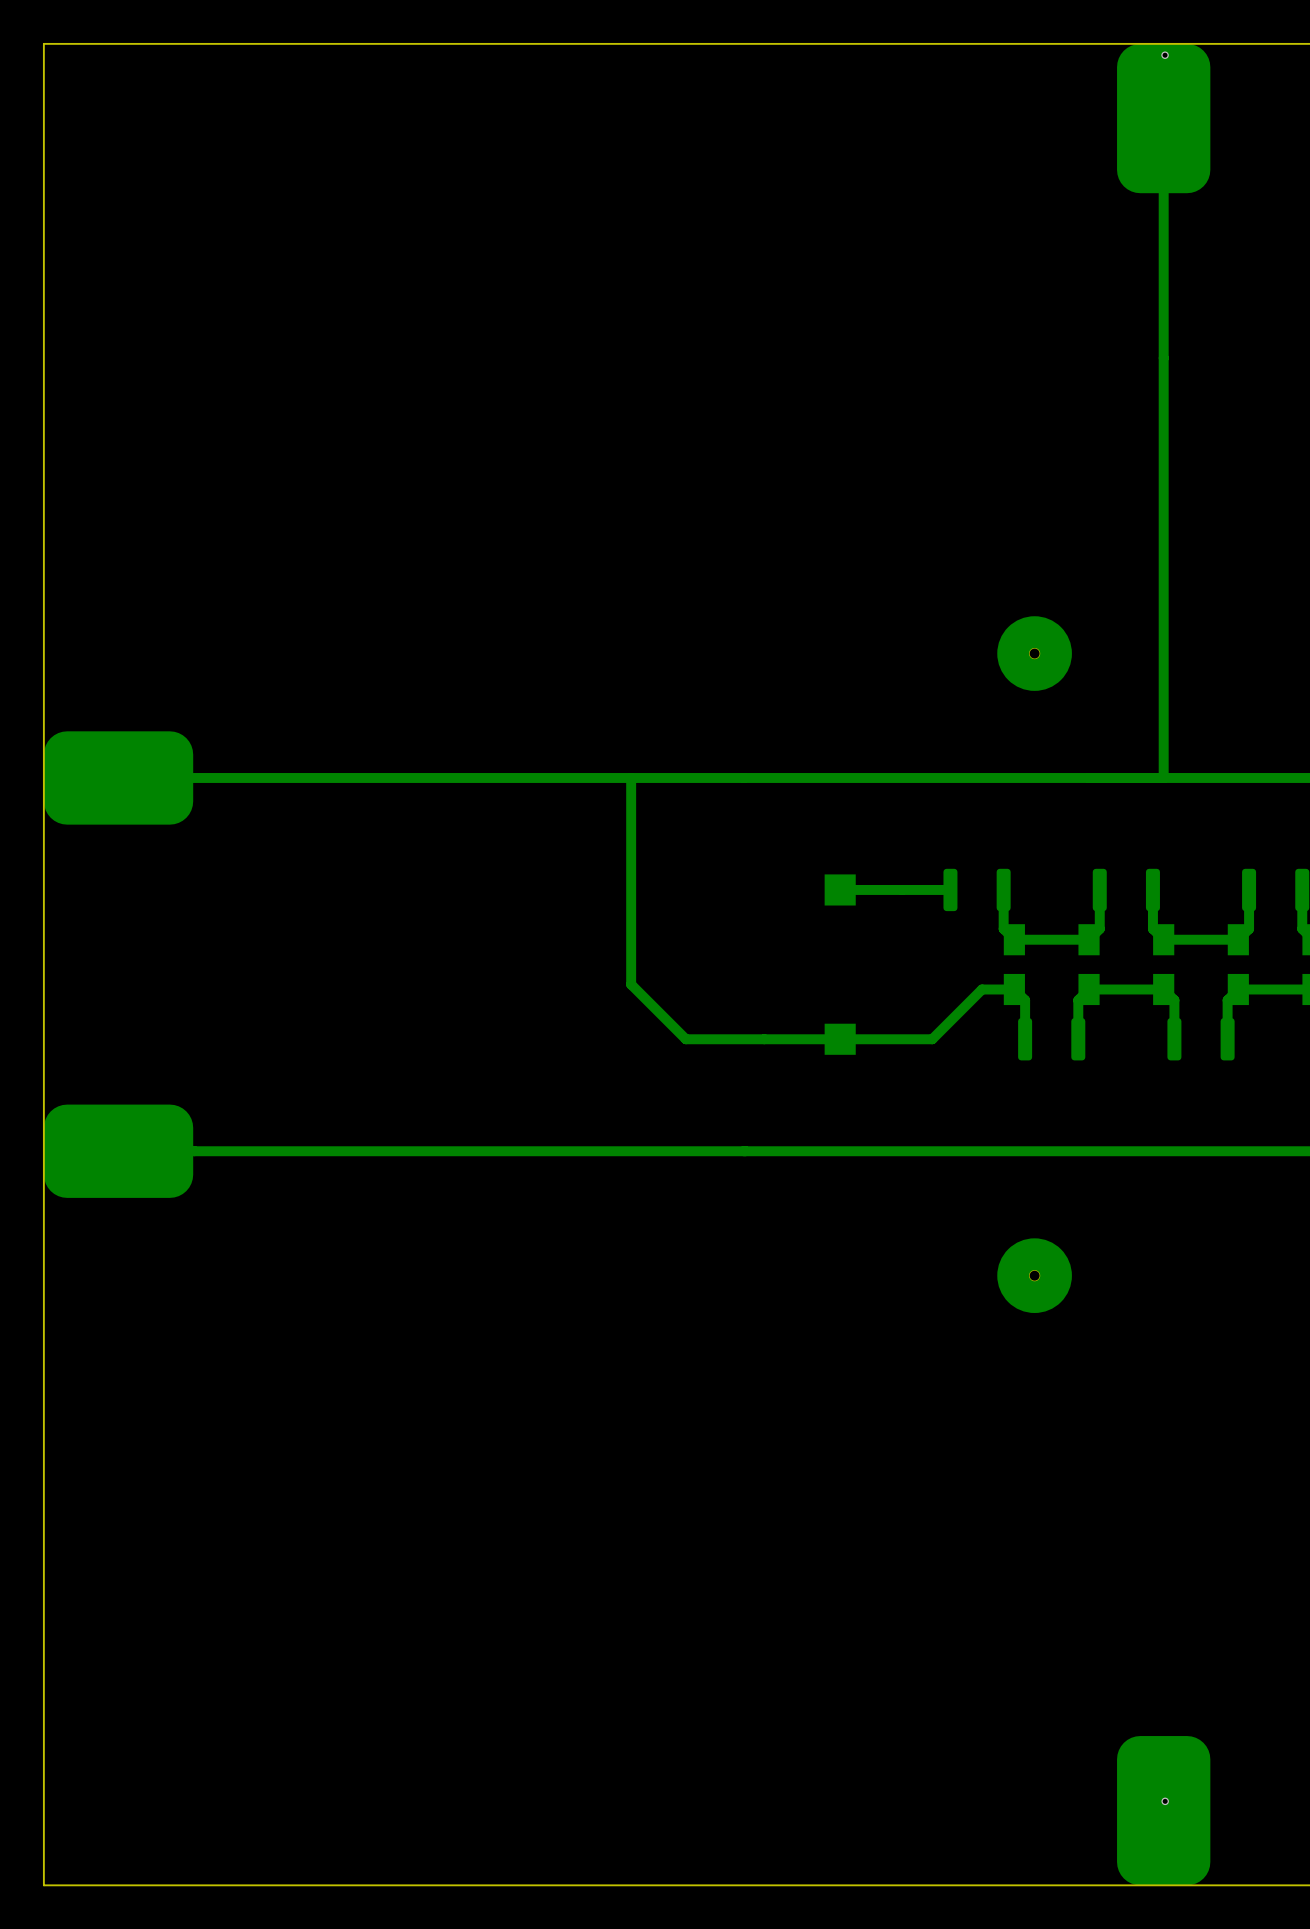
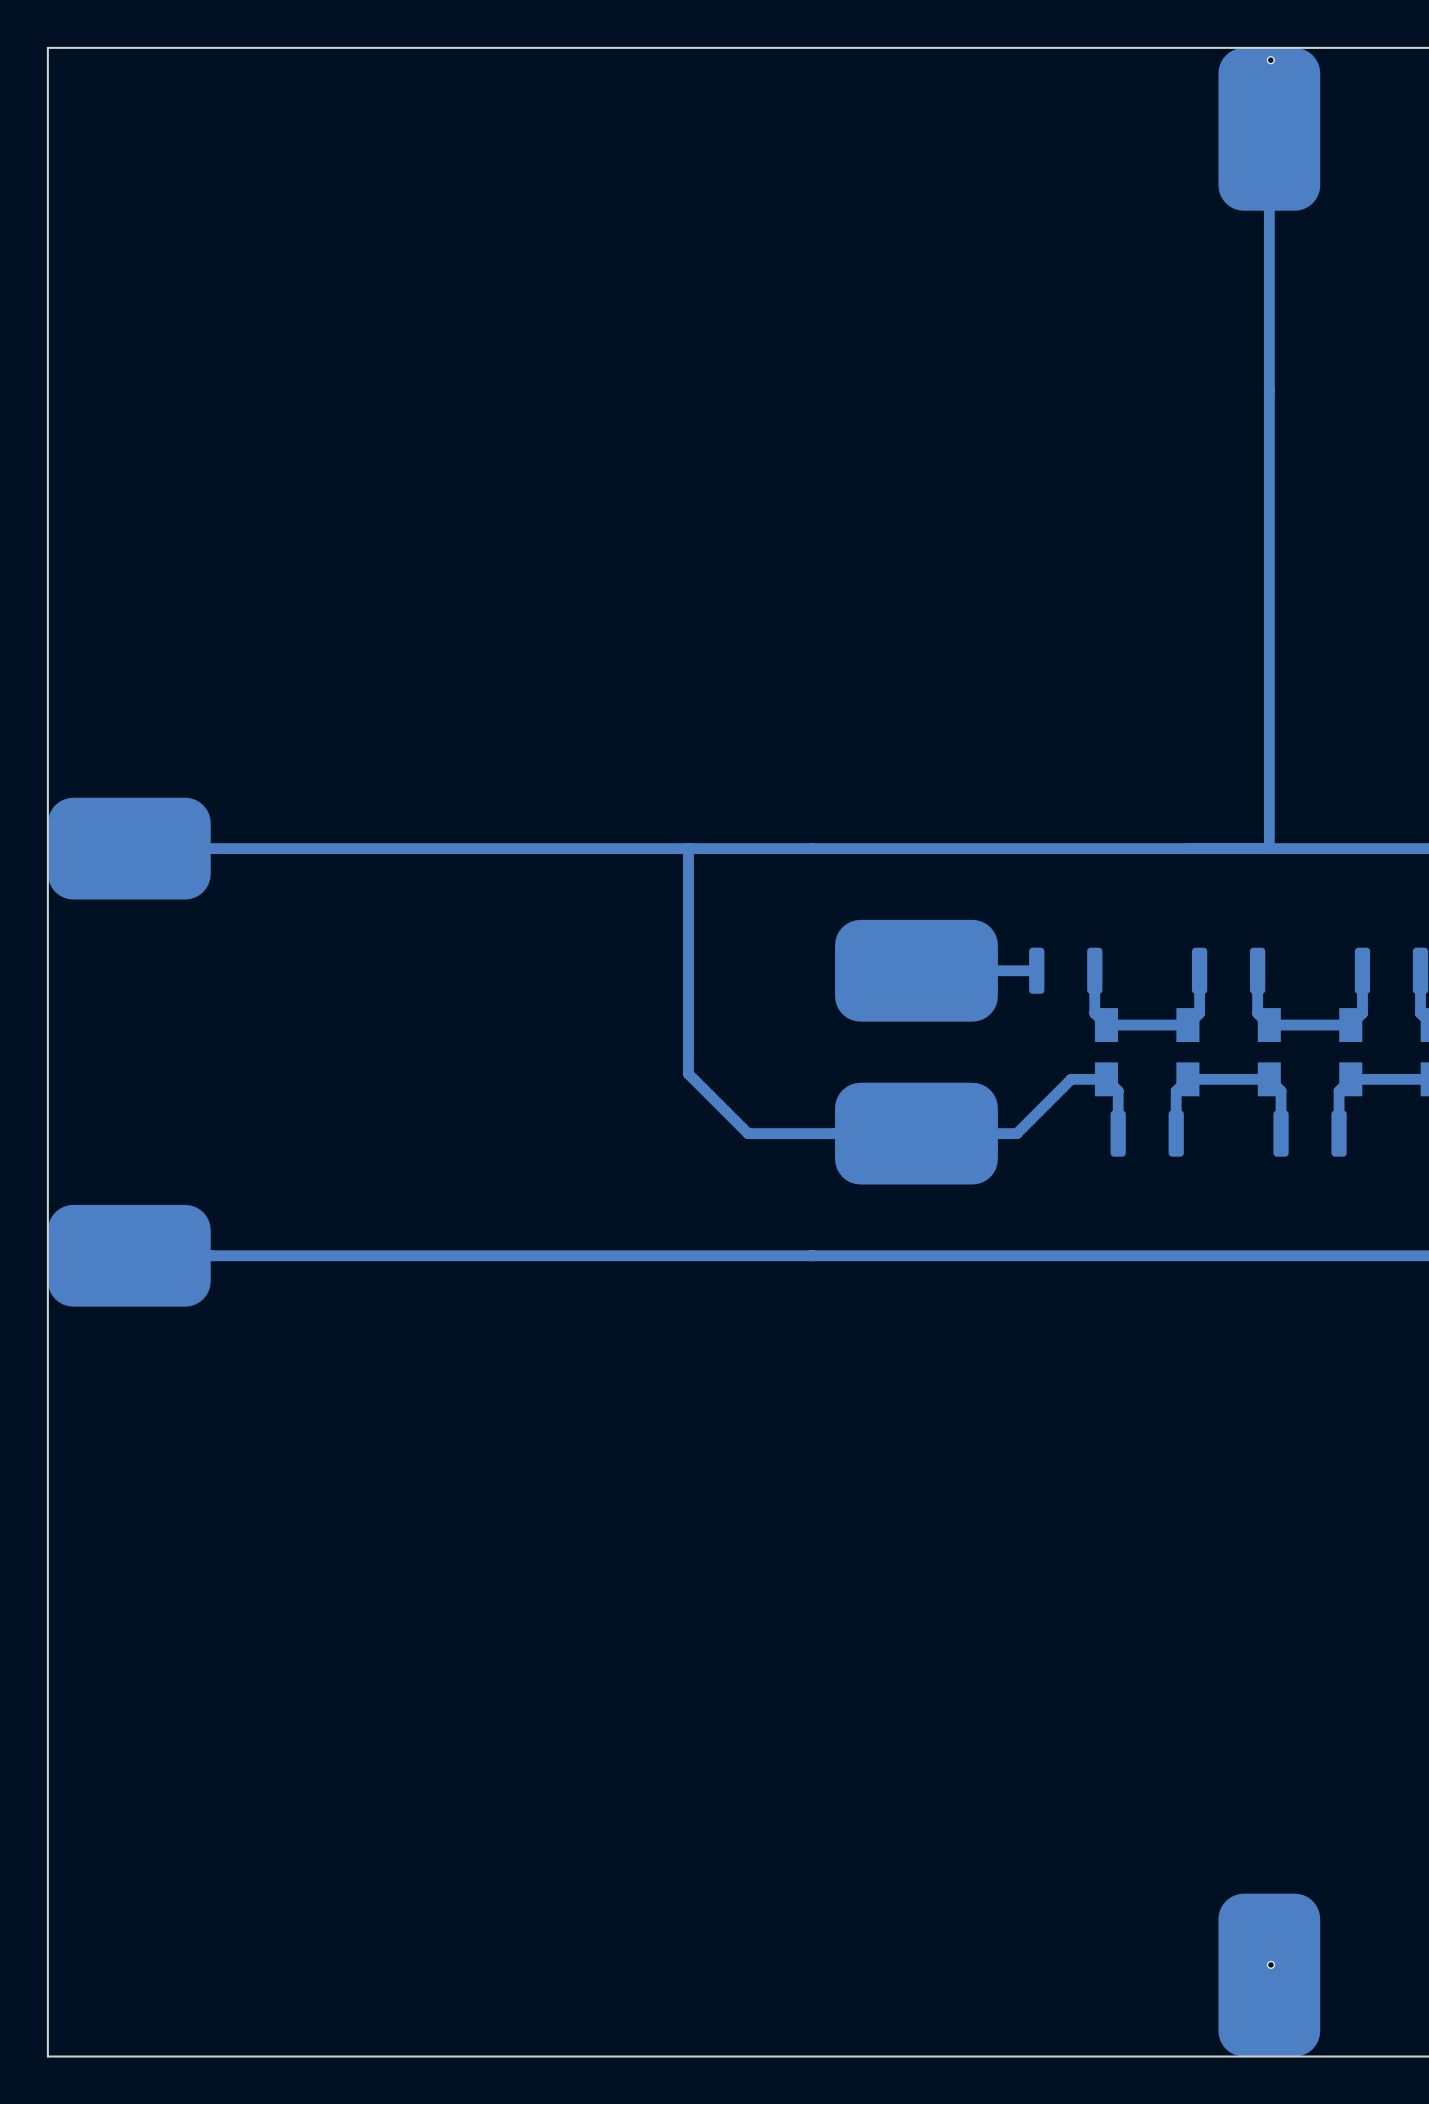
part: (1034, 653) -> none
part footprint: [824, 874, 856, 906] -> [835, 919, 998, 1022]
bottom track: (840, 889) (902, 889) -> none
part footprint: [824, 1023, 856, 1055] -> [835, 1082, 998, 1185]
part: (1034, 1275) -> none

